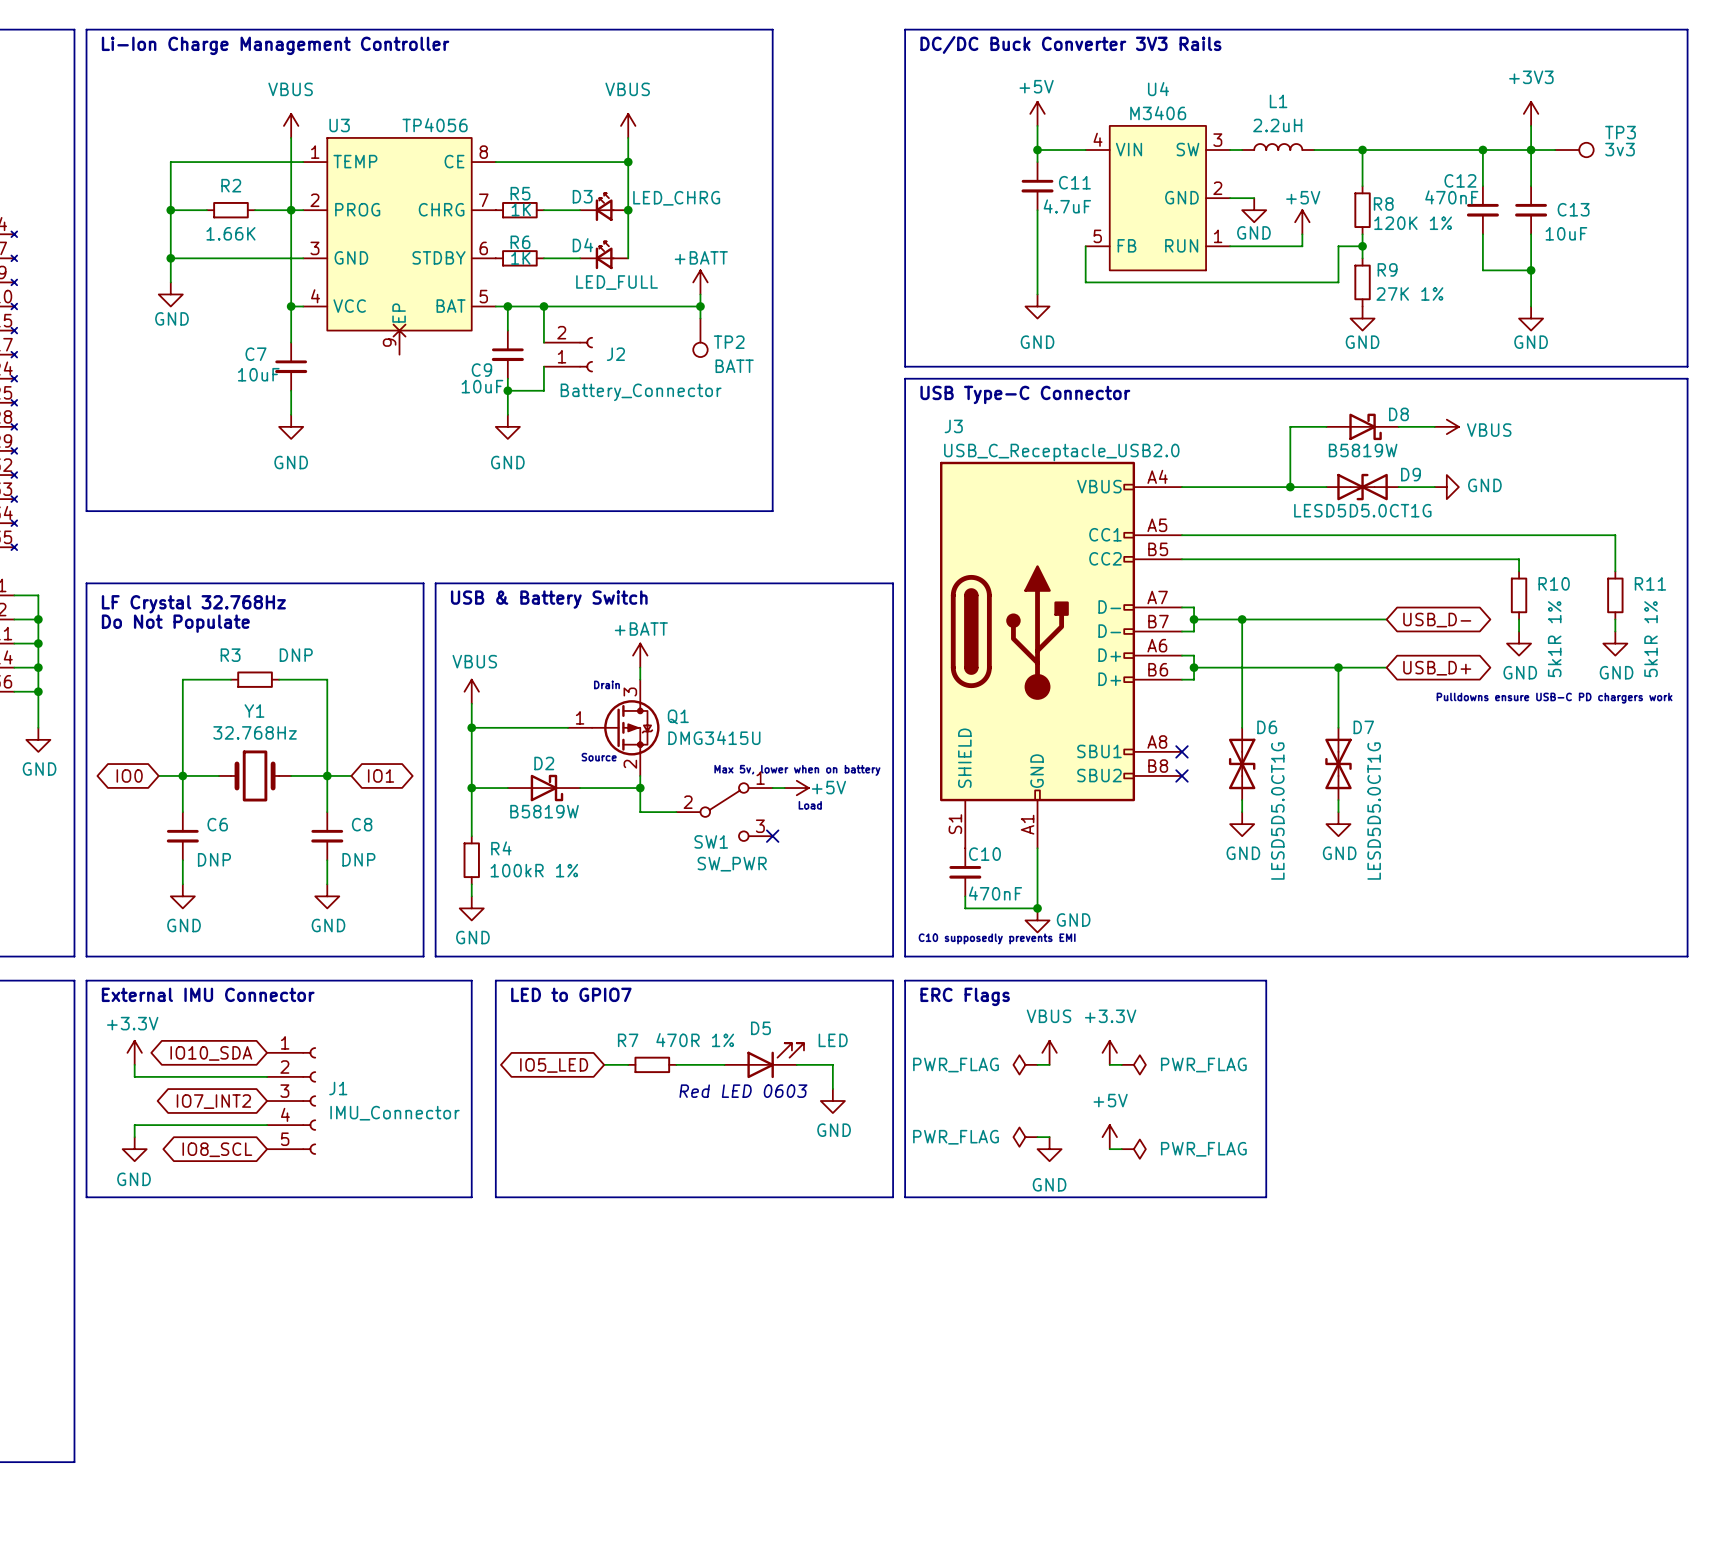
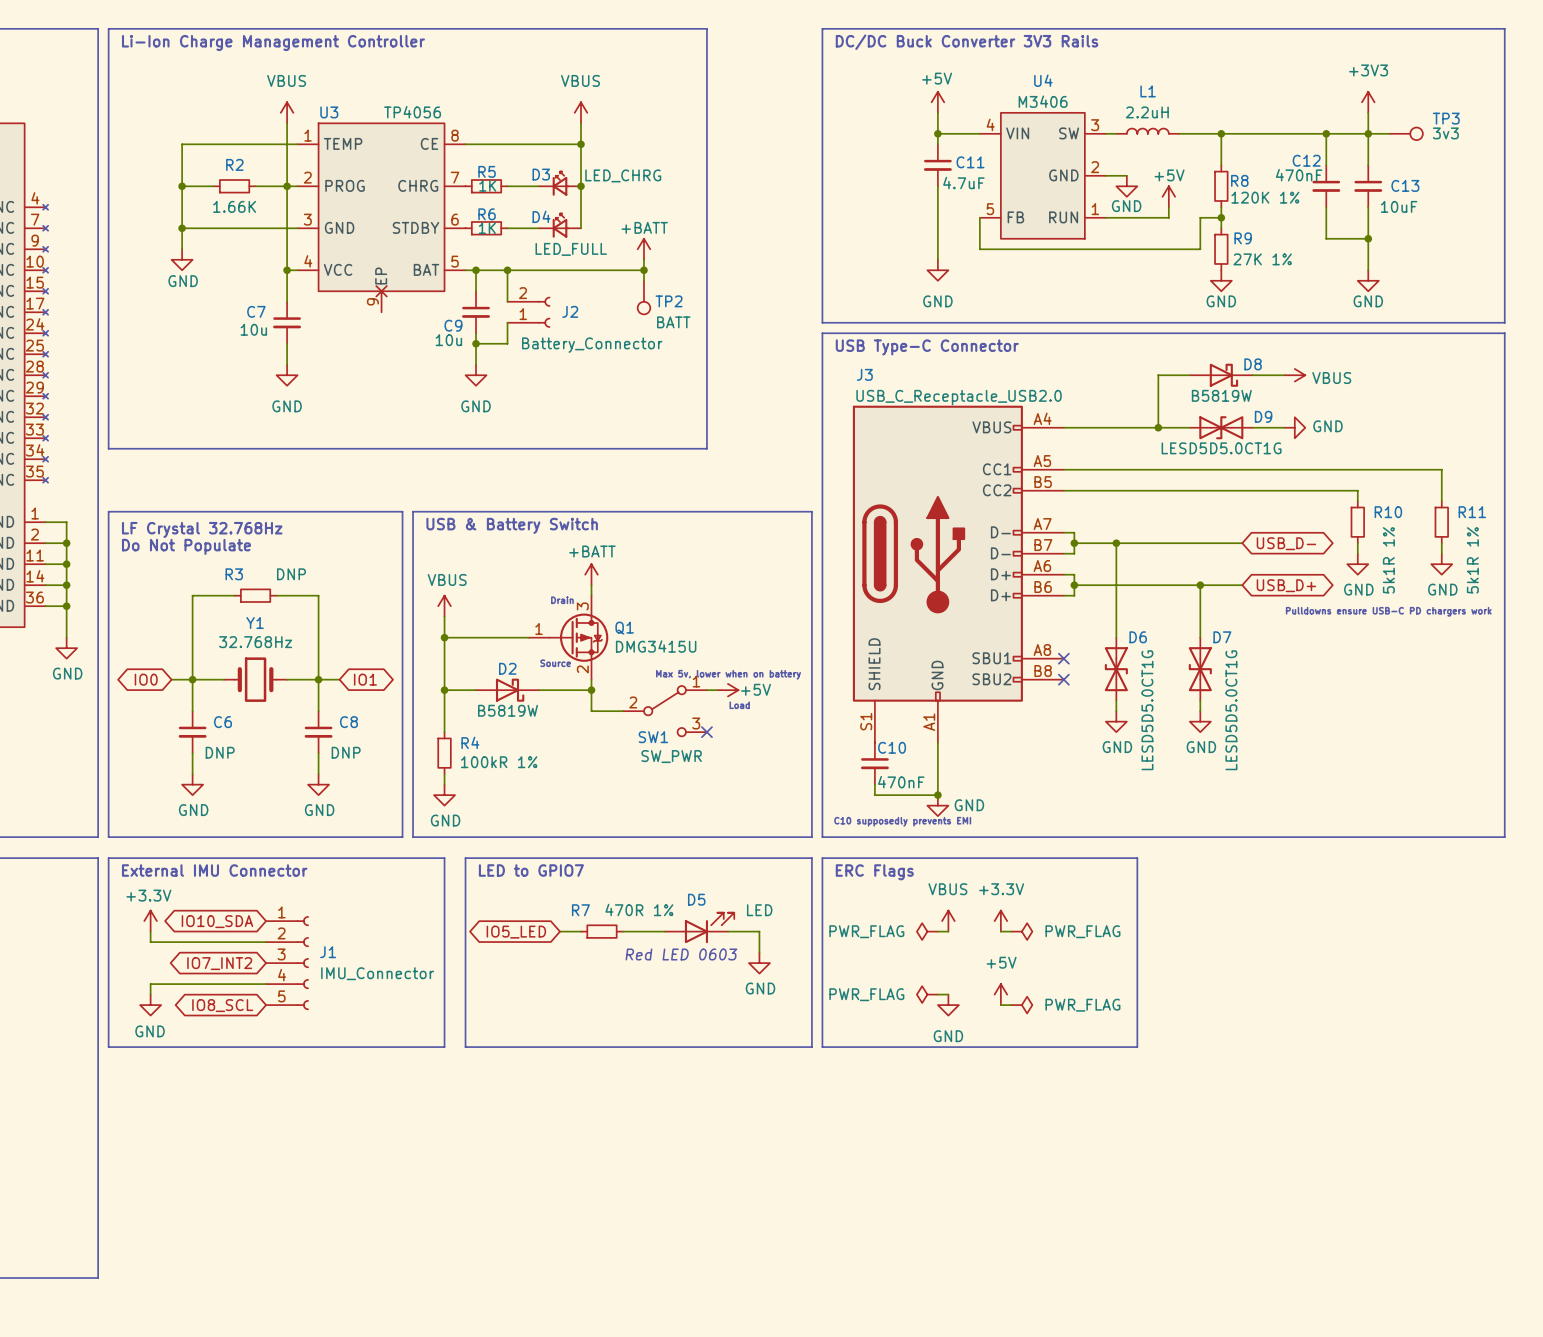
C7 value: 10uF (258, 374) -> 10u (253, 329)
C9 value: 10uF (482, 386) -> 10u (448, 340)

